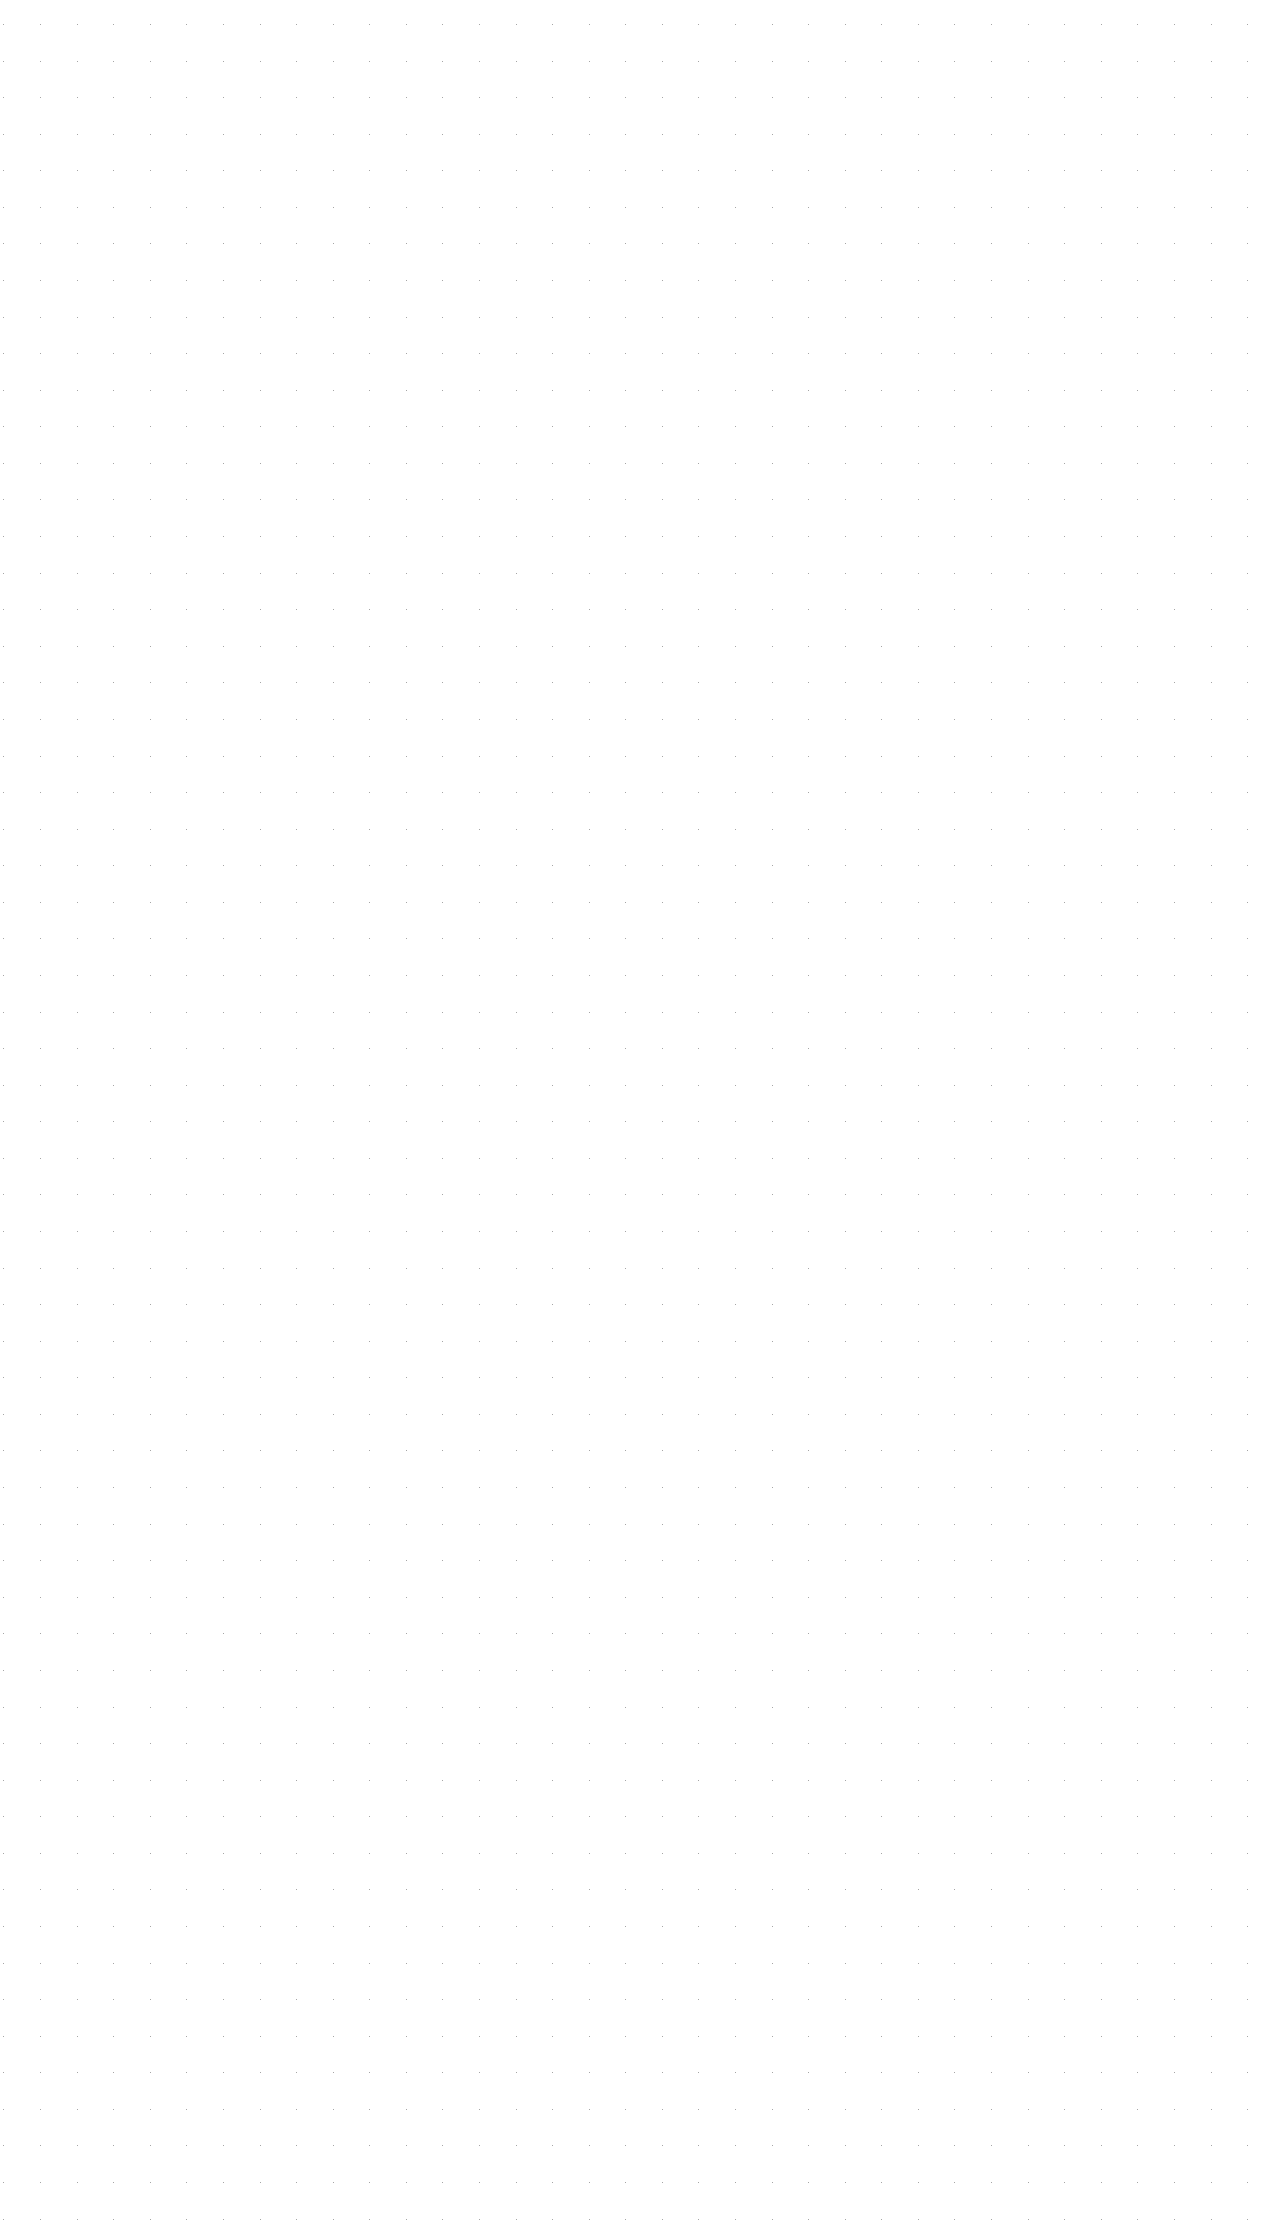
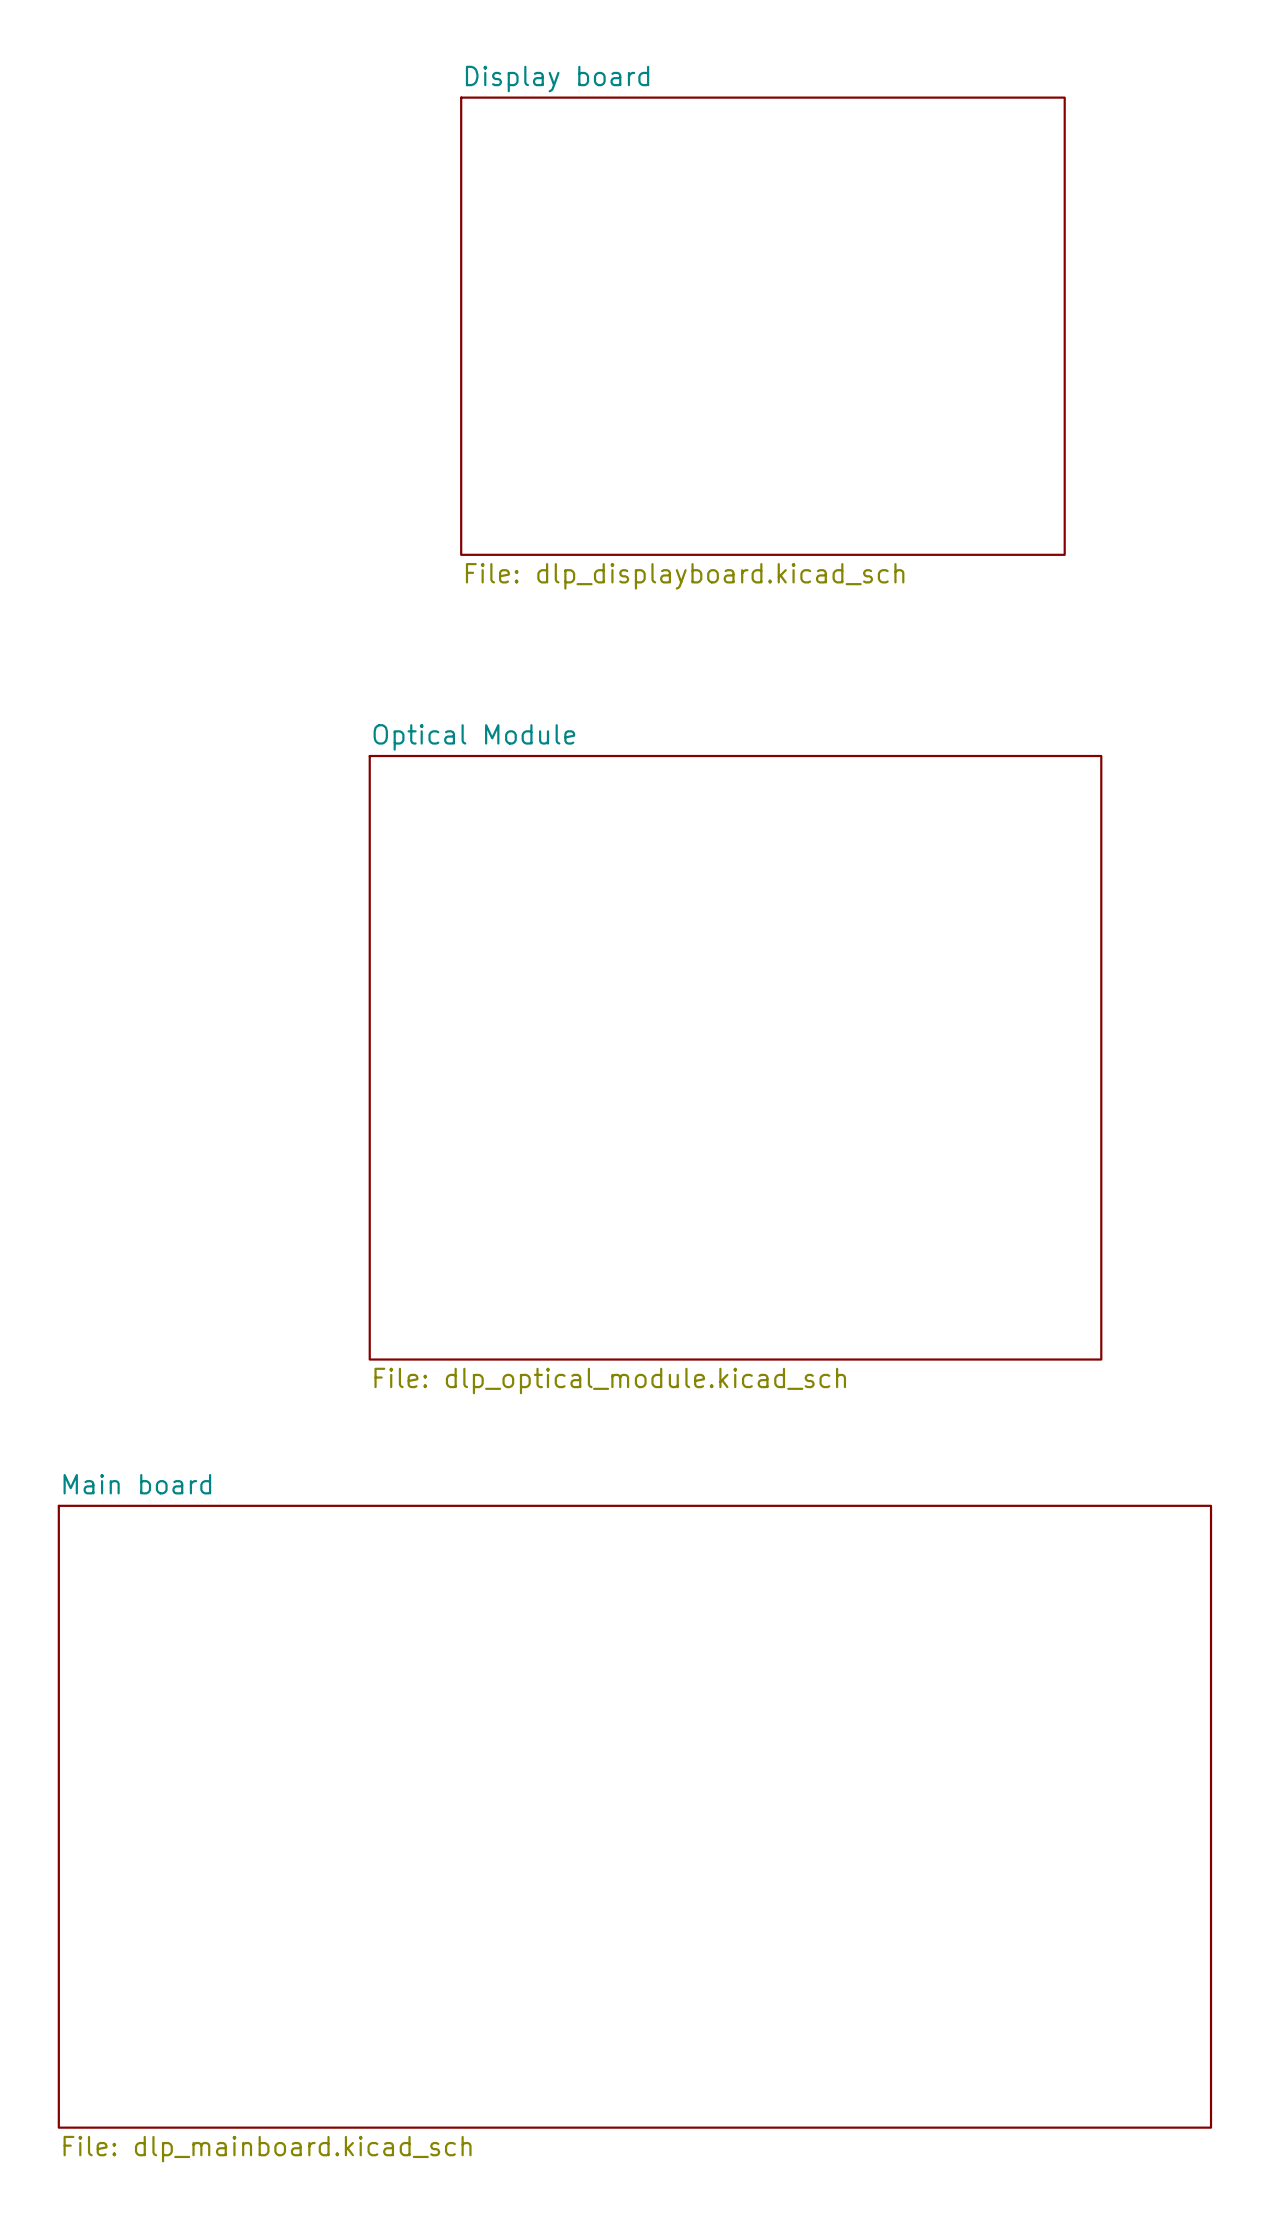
sheet Display board: none -> File: dlp_displayboard.kicad_sch (762, 326)
sheet Optical Module: none -> File: dlp_optical_module.kicad_sch (735, 1057)
sheet Main board: none -> File: dlp_mainboard.kicad_sch (634, 1816)

